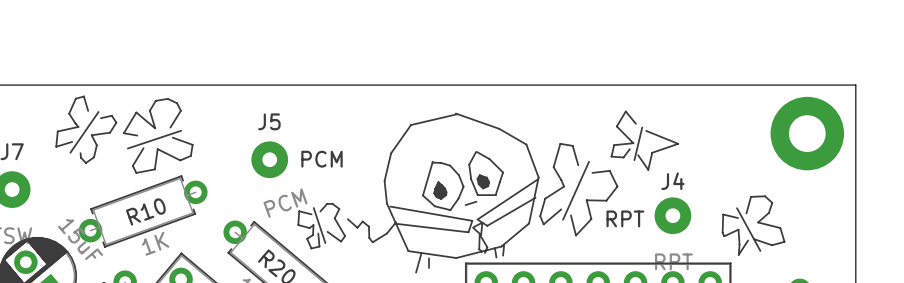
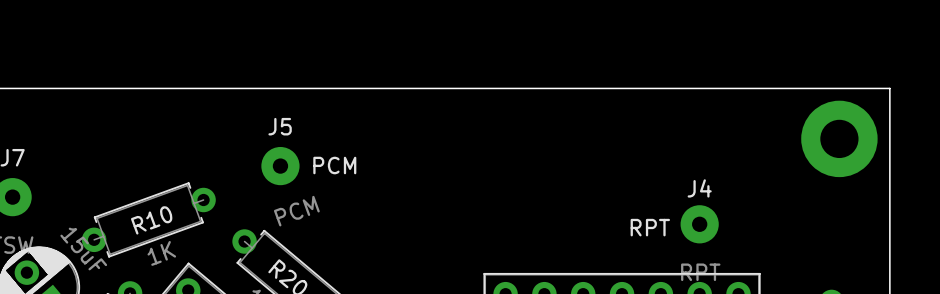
line: (88, 110) (83, 96) (75, 98) (69, 113) (78, 126) (57, 131) (56, 146) (72, 141) -> none
line: (98, 111) (70, 152) -> none
line: (455, 113) (499, 128) (526, 144) (538, 177) (529, 223) (501, 246) (456, 258) (408, 251) (386, 203) (384, 181) (391, 153) (411, 125) (457, 114) -> none
line: (100, 118) (111, 115) (116, 122) (110, 132) (91, 135) (96, 145) (94, 157) (85, 162) (81, 157) (80, 153) -> none
line: (635, 123) (625, 111) (616, 126) (633, 143) (614, 145) (611, 156) (623, 157) (629, 149) -> none
line: (170, 127) (180, 110) (177, 103) (167, 98) (155, 100) (149, 110) (155, 128) (136, 112) (123, 133) (137, 135) -> none
line: (642, 127) (634, 160) -> none
line: (181, 130) (127, 148) -> none
line: (646, 130) (678, 143) (652, 152) (648, 169) (638, 155) -> none
line: (172, 137) (192, 144) (190, 155) (180, 160) (157, 149) (154, 169) (136, 172) (132, 165) (143, 148) -> none
line: (476, 151) (469, 164) (471, 179) (477, 195) (495, 195) (503, 172) (489, 159) (477, 152) -> none
line: (432, 161) (422, 195) (434, 206) (450, 210) (463, 186) (458, 175) (450, 165) (440, 162) (432, 162) -> none
line: (589, 161) (563, 219) -> none
line: (578, 165) (572, 145) (560, 143) (553, 167) (564, 186) (545, 198) (540, 216) (543, 224) (561, 209) -> none
line: (592, 172) (609, 170) (617, 186) (606, 200) (586, 200) (591, 219) (575, 235) (570, 215) -> none
line: (479, 175) (477, 178) (478, 184) (483, 188) (488, 186) (489, 182) (486, 177) (479, 175) (486, 179) (479, 177) (487, 181) (478, 178) (488, 183) (479, 180) (487, 184) (479, 182) (487, 185) (479, 183) (483, 187) (486, 186) (482, 185) -> none
line: (537, 179) (477, 219) -> none
line: (438, 181) (434, 193) (436, 197) (441, 198) (446, 195) (446, 192) (445, 188) (438, 182) (435, 194) (439, 184) (436, 195) (440, 185) (437, 196) (442, 186) (438, 197) (442, 187) (440, 197) (443, 188) (441, 197) (445, 190) (443, 195) (445, 192) (445, 194) -> none
line: (535, 197) (487, 225) (478, 220) -> none
line: (476, 201) (465, 205) -> none
line: (390, 206) (472, 220) (468, 232) (397, 223) -> none
line: (313, 208) (325, 243) -> none
line: (737, 208) (760, 250) -> none
line: (320, 211) (326, 204) (332, 203) (339, 208) (334, 218) (345, 236) (341, 241) (327, 231) -> none
line: (746, 213) (751, 196) (765, 196) (772, 202) (768, 212) (758, 222) (780, 228) (784, 241) (772, 245) (754, 239) -> none
line: (311, 214) (299, 211) (298, 225) (309, 228) (313, 225) (313, 235) (307, 238) (311, 248) (319, 246) (318, 233) -> none
line: (738, 218) (723, 214) (722, 232) (724, 236) (738, 229) (738, 254) (748, 240) -> none
line: (347, 219) (357, 227) (362, 221) (368, 226) (369, 238) (372, 242) (386, 233) (396, 222) -> none
line: (473, 227) (482, 222) (481, 234) (473, 227) -> none
line: (479, 234) (479, 249) (481, 251) -> none
line: (481, 236) (487, 247) (484, 253) -> none
line: (504, 245) (503, 255) -> none
line: (494, 248) (496, 257) -> none
line: (421, 253) (416, 272) -> none
line: (428, 258) (428, 268) -> none

